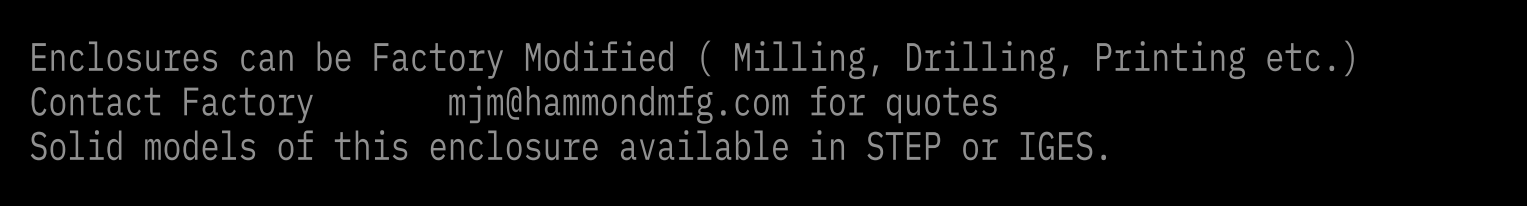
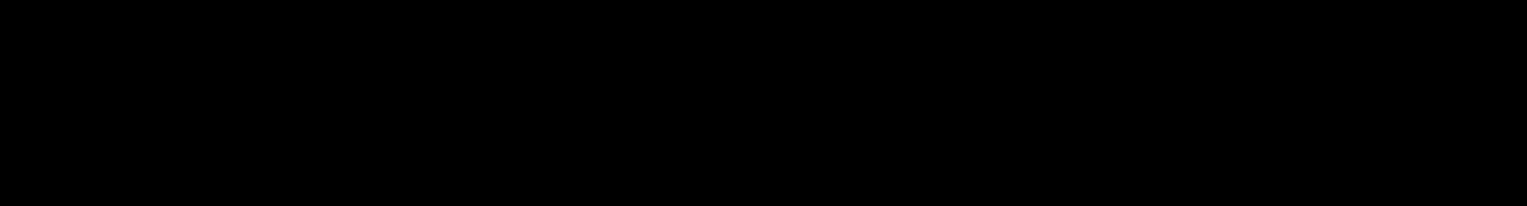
text: Enclosures can be Factory Modified ( Milling, Drilling, Printing etc.) (693, 59) -> none
text: Contact Factory mjm@hammondmfg.com for quotes (514, 104) -> none
text: Solid models of this enclosure available in STEP or IGES. (568, 145) -> none

